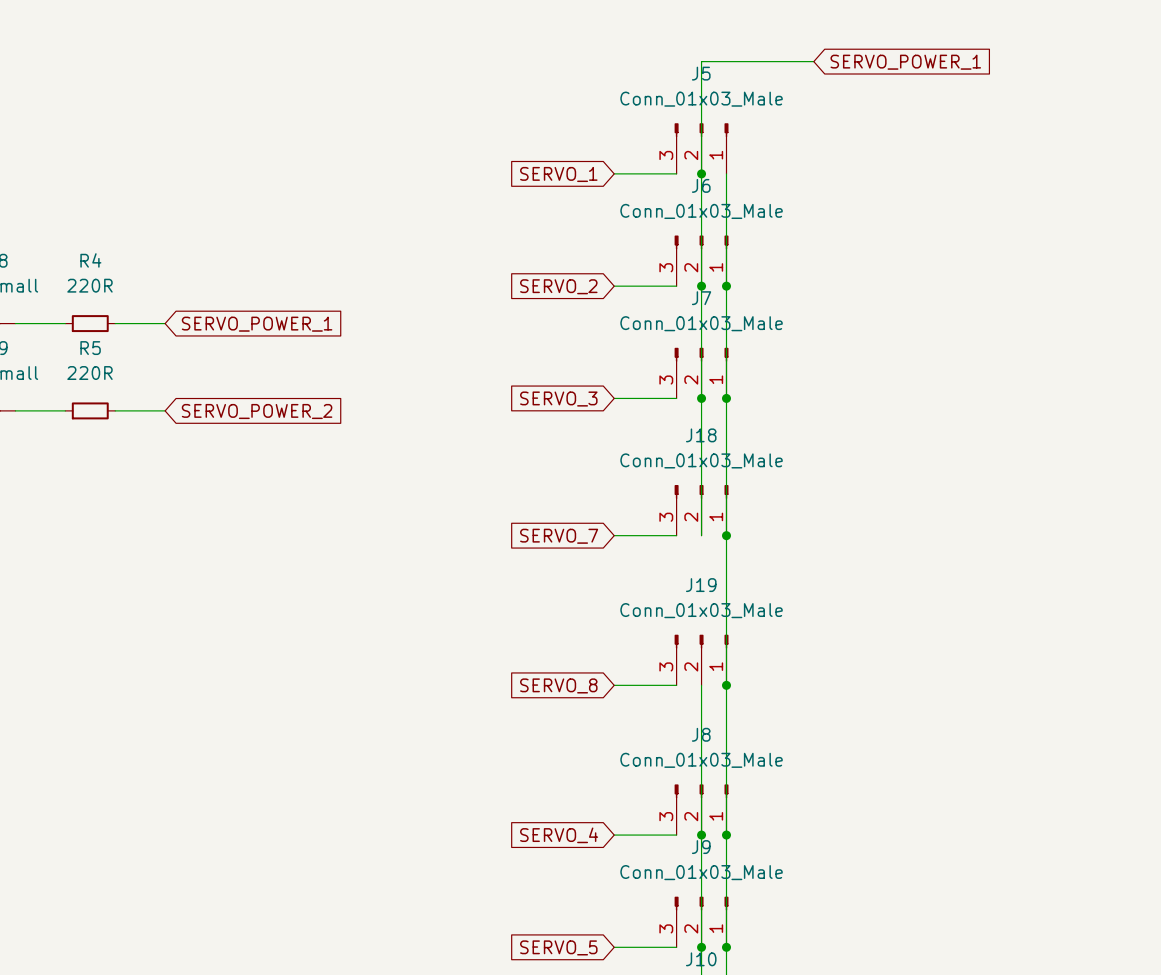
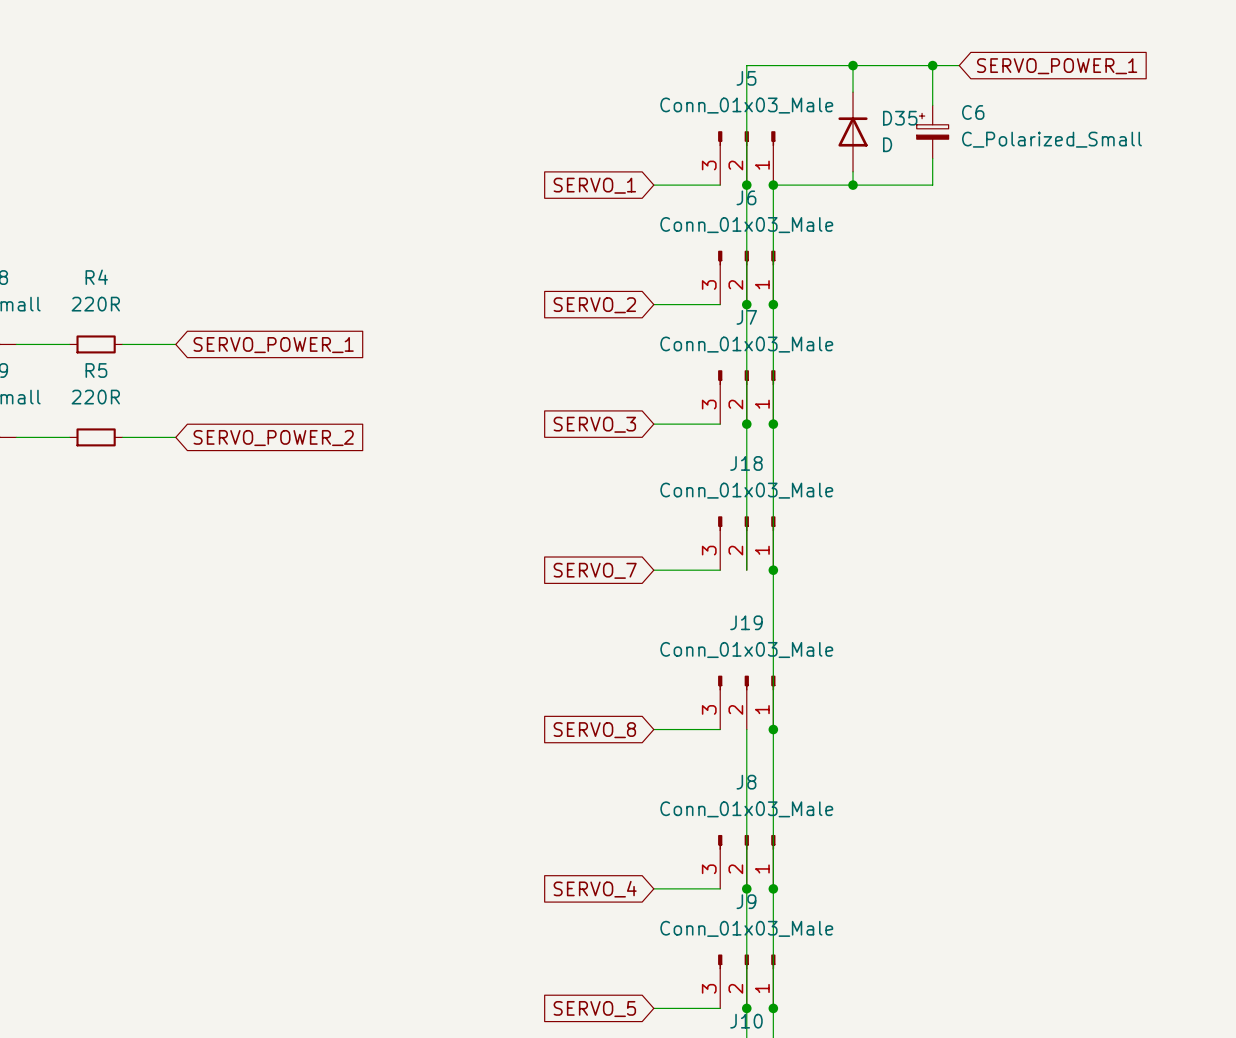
wire: none -> (853, 65) (853, 92)
junction: none -> (853, 65)
wire: none -> (866, 65) (959, 65)
wire: none -> (932, 65) (932, 105)
junction: none -> (932, 65)
global label position: SERVO_POWER_1 (905, 62) -> SERVO_POWER_1 (1057, 66)
D35: none -> D (853, 131)
C6: none -> C_Polarized_Small (932, 131)
wire: none -> (932, 158) (932, 185) (773, 185)
wire: none -> (853, 171) (853, 185)
junction: none -> (773, 185)
junction: none -> (853, 185)

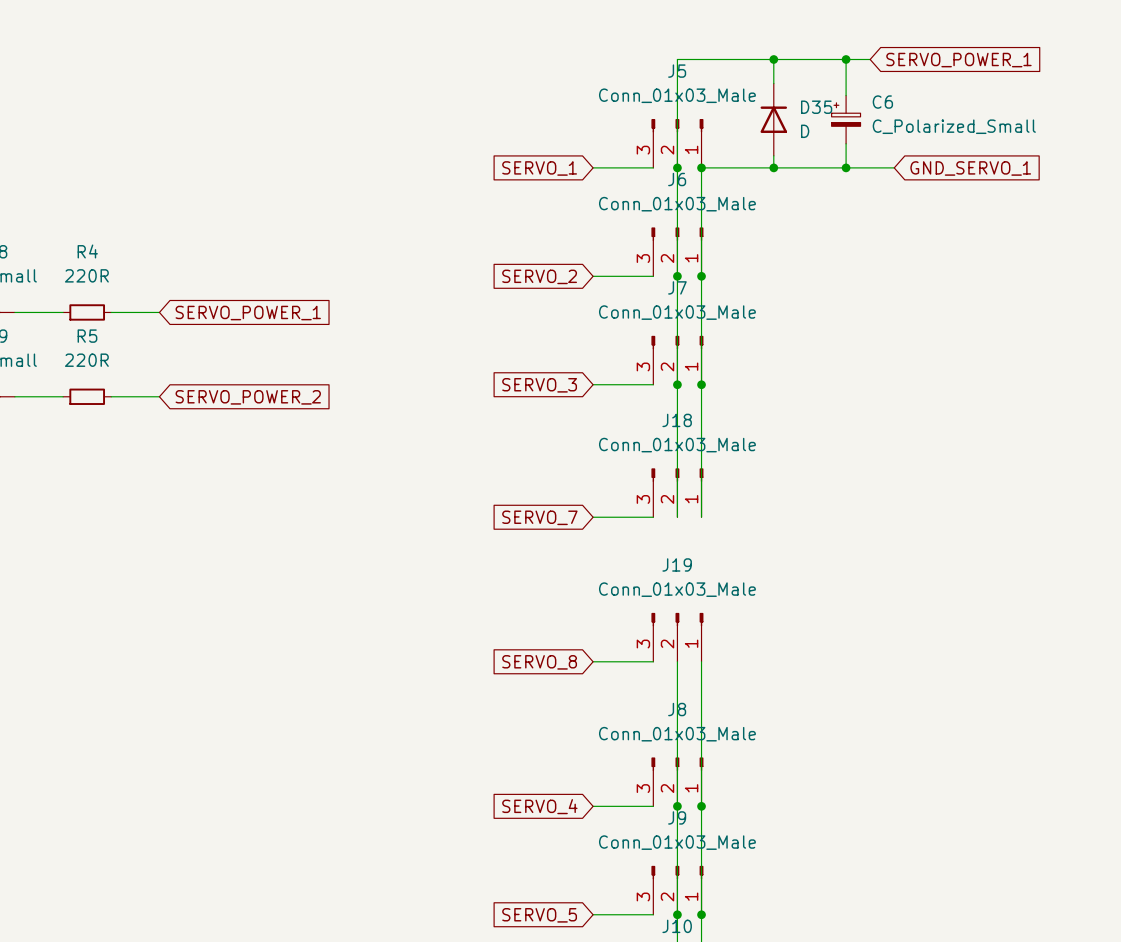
wire: none -> (846, 167) (894, 167)
junction: none -> (846, 167)
global label: none -> GND_SERVO_1 (970, 168)
wire: (773, 570) (773, 729) -> none
junction: (773, 570) -> none
junction: (773, 729) -> none

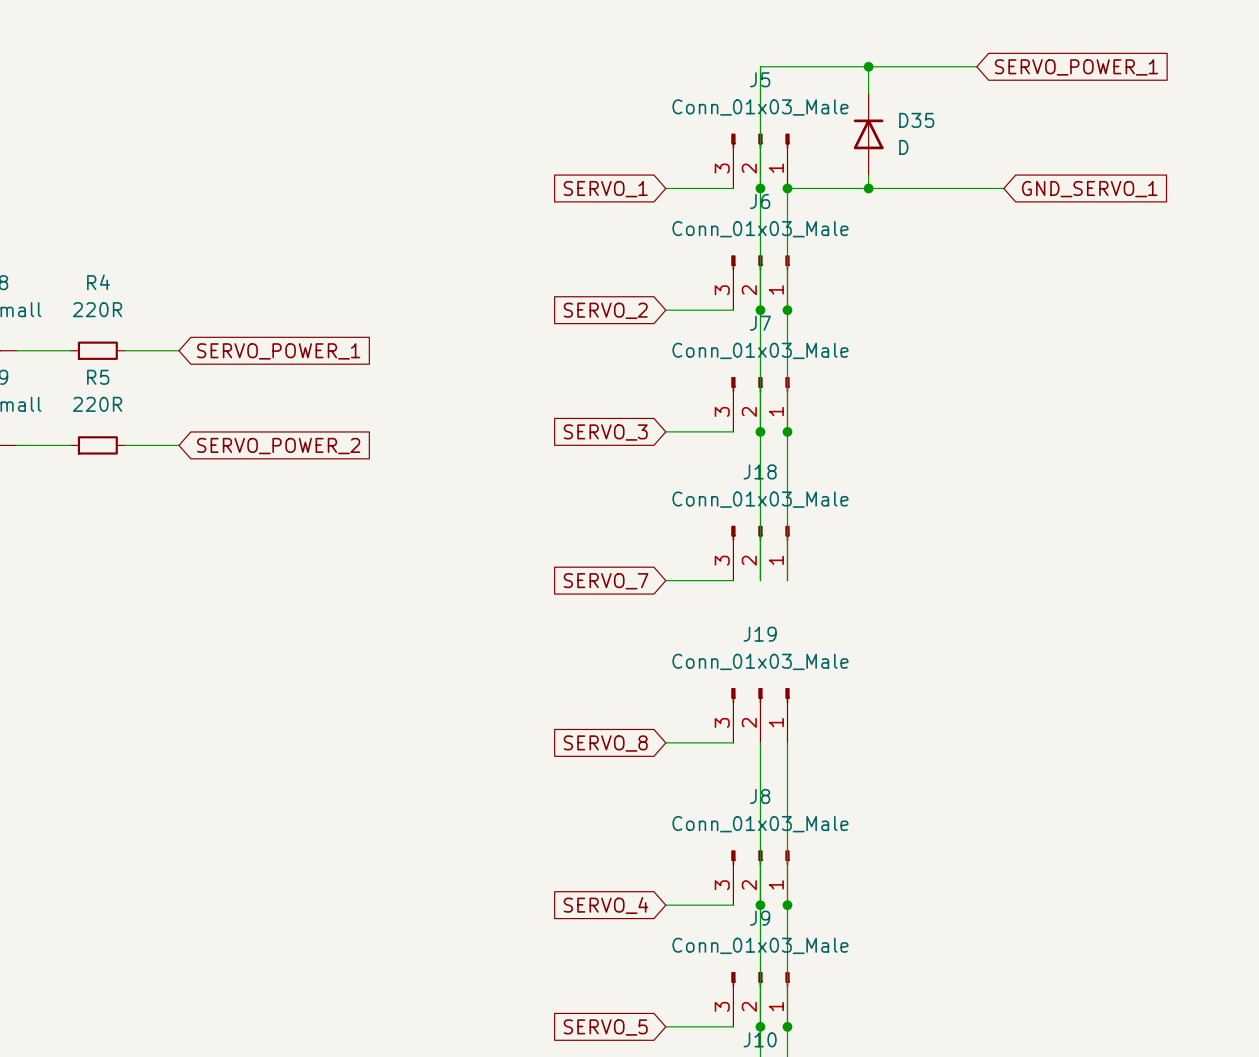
wire: (846, 59) (846, 95) -> none
junction: (846, 59) -> none
C6: C_Polarized_Small (846, 119) -> none
wire: (846, 143) (846, 167) -> none
junction: (846, 167) -> none

